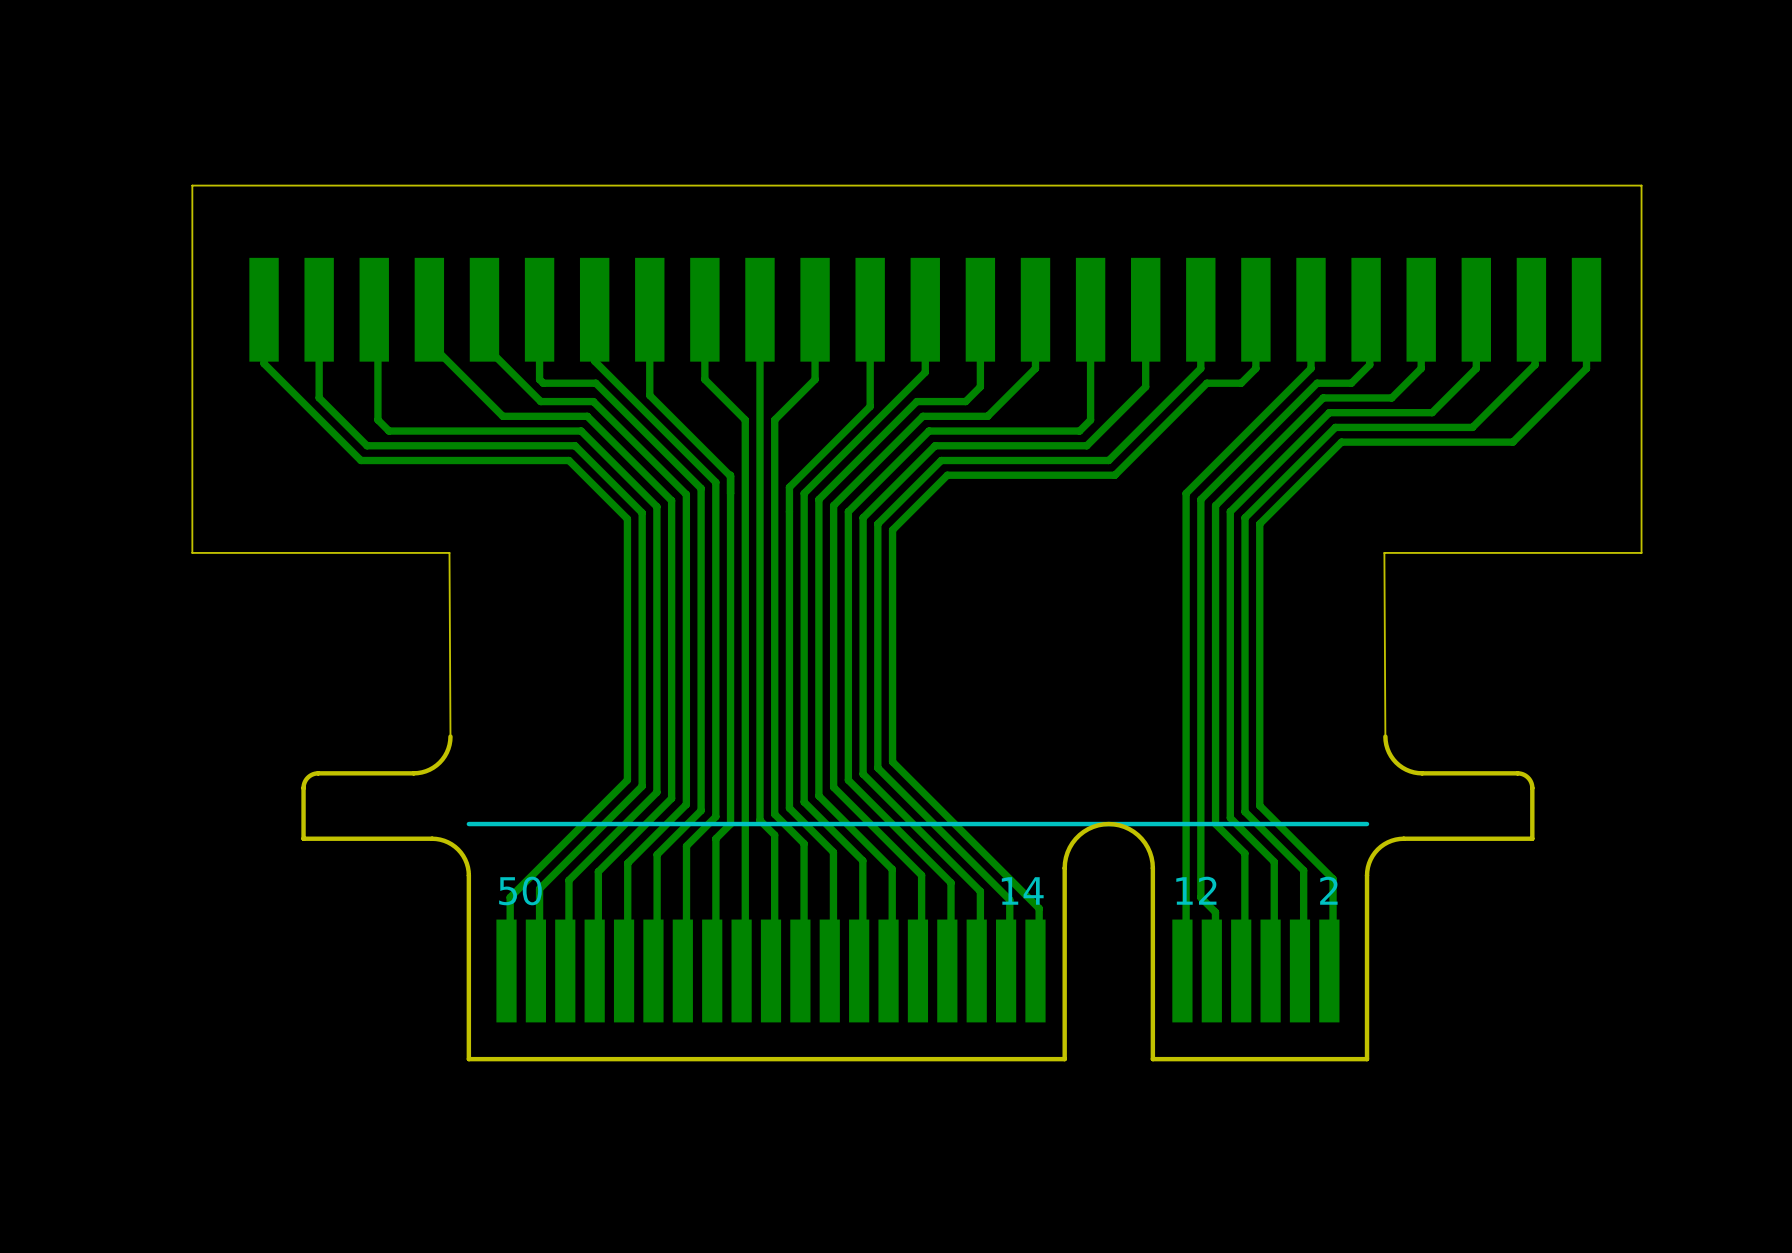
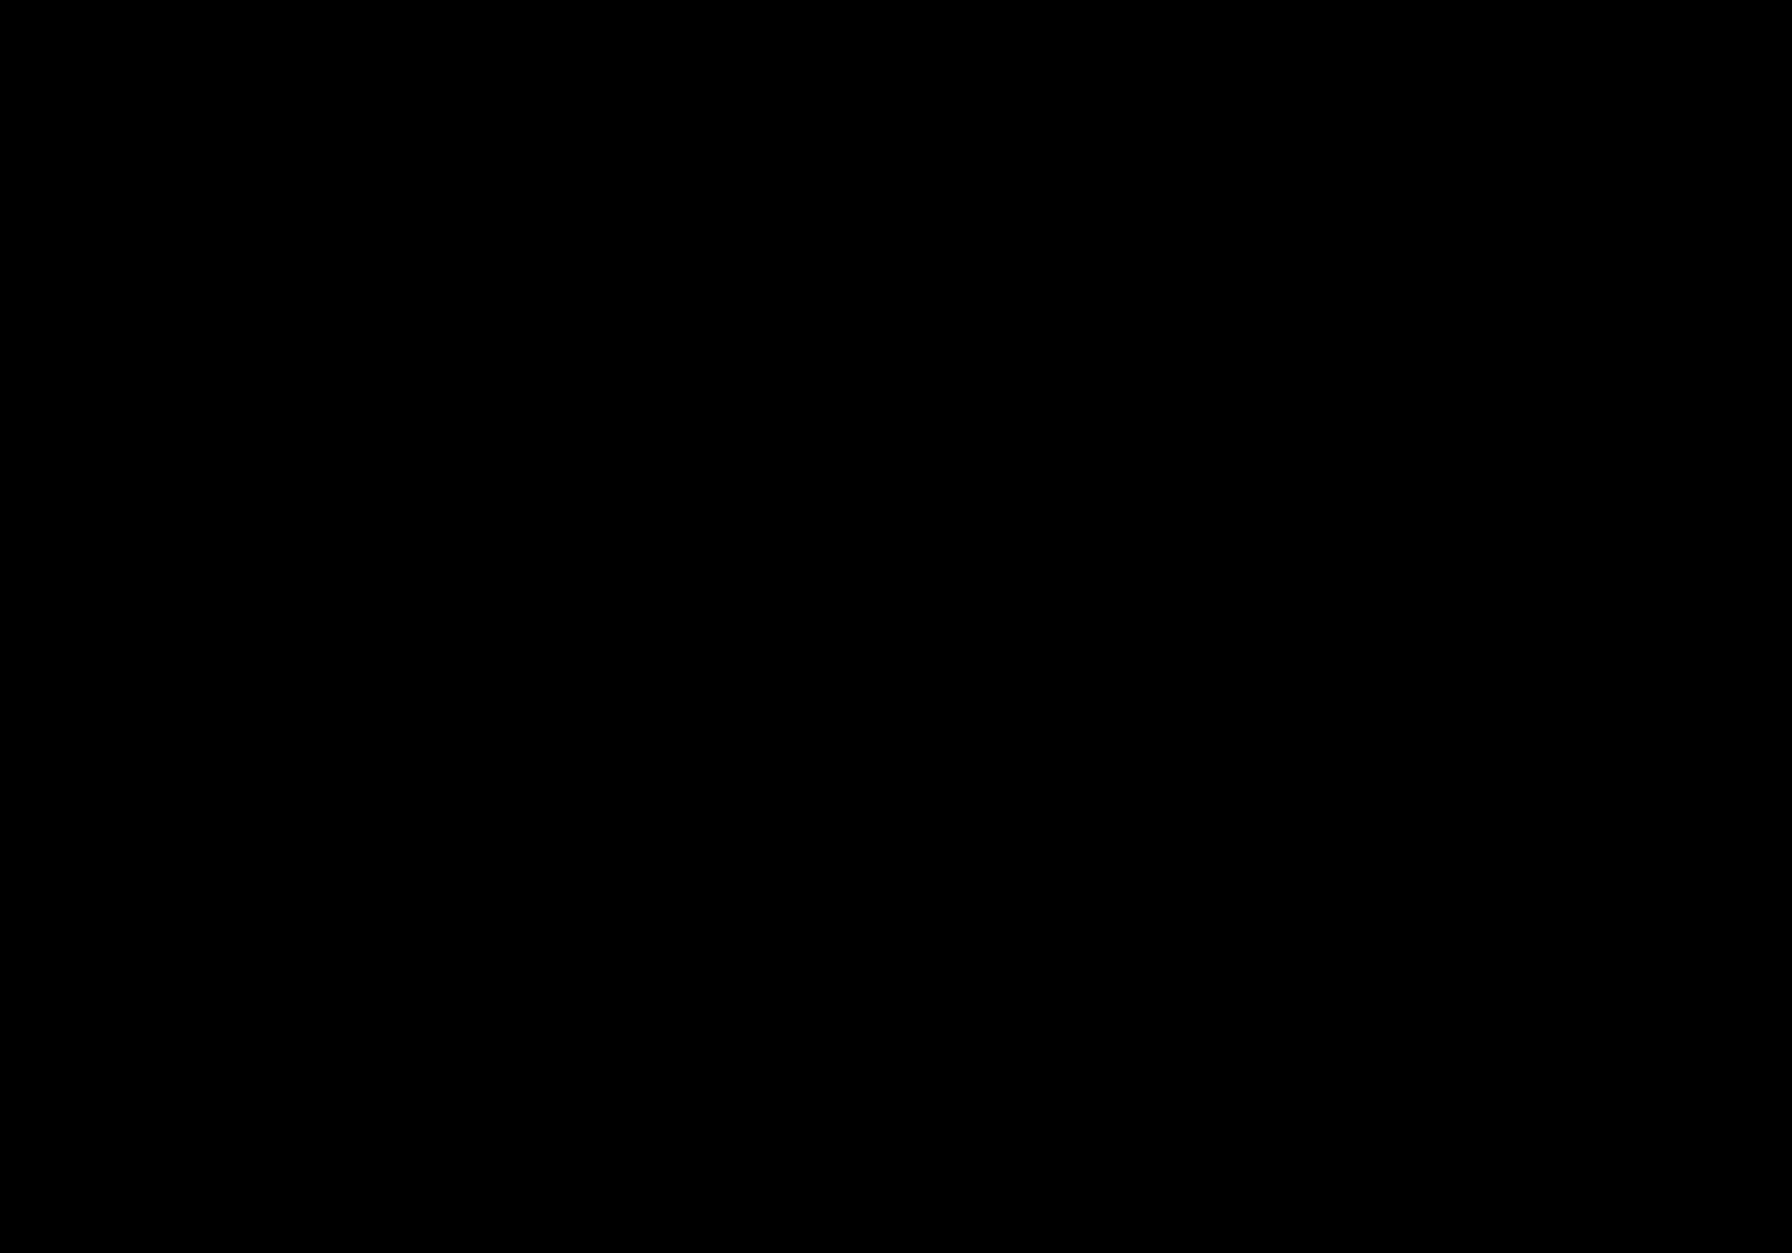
drawing: [249, 257, 1602, 362] -> none
track: (264, 309) (264, 363) (360, 460) (569, 460) (627, 518) (627, 780) (510, 897) (510, 970) -> none
track: (319, 309) (319, 397) (367, 445) (575, 445) (642, 512) (642, 786) (539, 888) (539, 970) -> none
track: (374, 309) (377, 313) (377, 419) (389, 431) (581, 431) (656, 506) (656, 792) (568, 880) (568, 970) -> none
track: (429, 309) (429, 342) (502, 416) (587, 416) (671, 500) (671, 798) (598, 871) (598, 970) -> none
track: (484, 309) (484, 345) (540, 401) (593, 401) (686, 494) (686, 804) (627, 863) (627, 970) -> none
track: (539, 309) (539, 379) (543, 383) (595, 383) (701, 488) (701, 810) (657, 854) (657, 970) -> none
track: (594, 309) (594, 361) (715, 482) (715, 816) (686, 846) (686, 970) -> none
track: (649, 309) (649, 395) (730, 476) -> none
track: (704, 309) (704, 379) (745, 419) (745, 970) -> none
track: (759, 309) (759, 820) (774, 835) (774, 970) -> none
track: (815, 309) (815, 379) (774, 419) (774, 814) (804, 843) (804, 970) -> none
track: (925, 309) (925, 372) (804, 493) (804, 802) (862, 860) (862, 970) -> none
track: (980, 309) (980, 386) (965, 401) (916, 401) (818, 499) (818, 795) (892, 869) (892, 970) -> none
track: (1090, 309) (1090, 420) (1079, 431) (929, 431) (848, 511) (848, 780) (950, 882) (950, 970) -> none
track: (1145, 309) (1145, 386) (1086, 445) (935, 445) (863, 517) (863, 774) (980, 891) (980, 970) -> none
track: (1200, 309) (1200, 368) (1108, 460) (941, 460) (877, 523) (877, 767) (1009, 899) (1009, 970) -> none
track: (1255, 309) (1255, 368) (1241, 383) (1206, 383) (1114, 475) (947, 475) (892, 530) (892, 761) (1039, 908) (1039, 970) -> none
track: (1311, 309) (1311, 368) (1186, 493) (1186, 970) -> none
track: (1366, 309) (1369, 313) (1369, 364) (1351, 383) (1317, 383) (1200, 499) (1200, 897) (1215, 912) (1215, 970) -> none
track: (1421, 309) (1421, 368) (1391, 397) (1323, 397) (1215, 505) (1215, 824) (1244, 853) (1244, 970) -> none
track: (1476, 309) (1476, 368) (1432, 412) (1329, 412) (1230, 511) (1230, 817) (1274, 861) (1274, 970) -> none
track: (1531, 309) (1535, 313) (1535, 364) (1472, 427) (1335, 427) (1245, 517) (1245, 811) (1303, 870) (1303, 970) -> none
track: (1586, 309) (1586, 368) (1512, 442) (1341, 442) (1259, 523) (1259, 805) (1333, 879) (1333, 970) -> none
track: (870, 345) (870, 406) (789, 487) (789, 808) (833, 852) (833, 970) -> none
track: (1035, 352) (1035, 368) (987, 416) (922, 416) (833, 505) (833, 787) (921, 875) (921, 970) -> none
track: (730, 475) (730, 824) (715, 838) (715, 970) -> none
board edge: (1385, 736) (1384, 552) (1641, 552) (1641, 185) (192, 185) (192, 552) (449, 552) (450, 736) -> none
part: (917, 897) -> none

